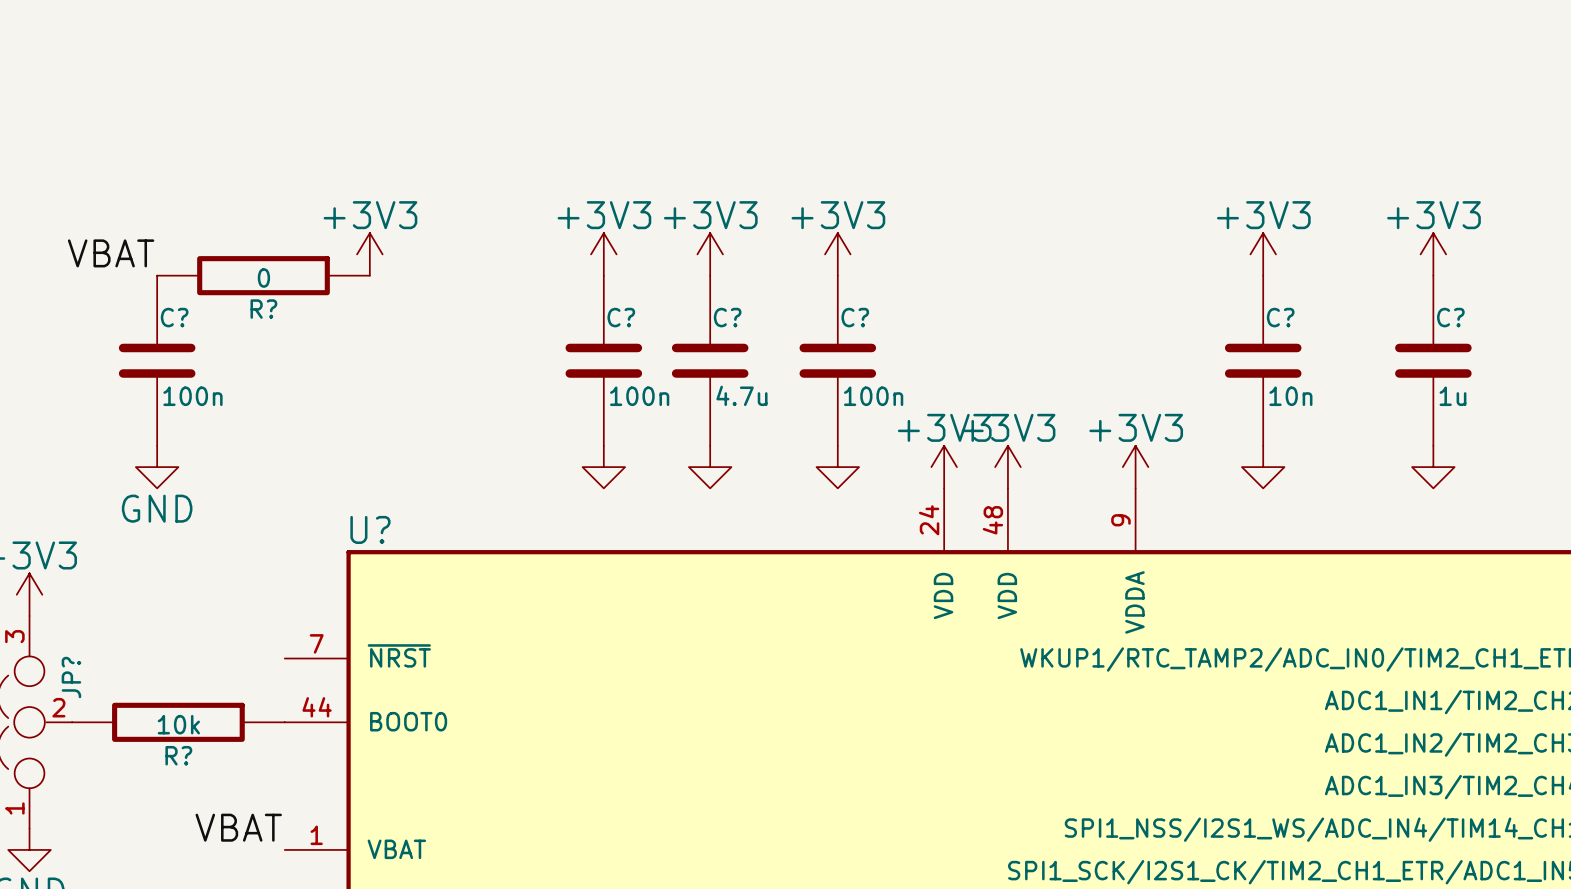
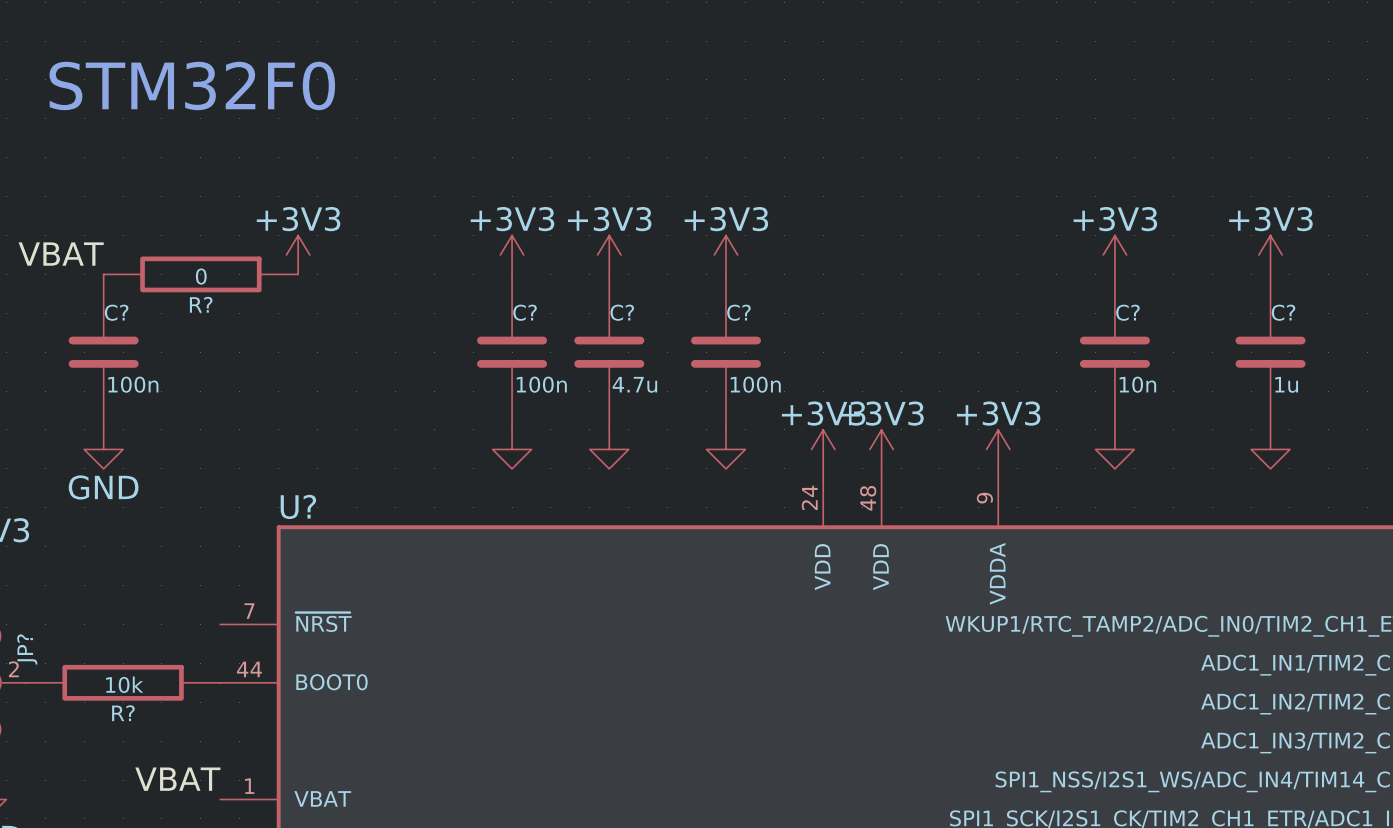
text: none -> STM32F0 (192, 85)

